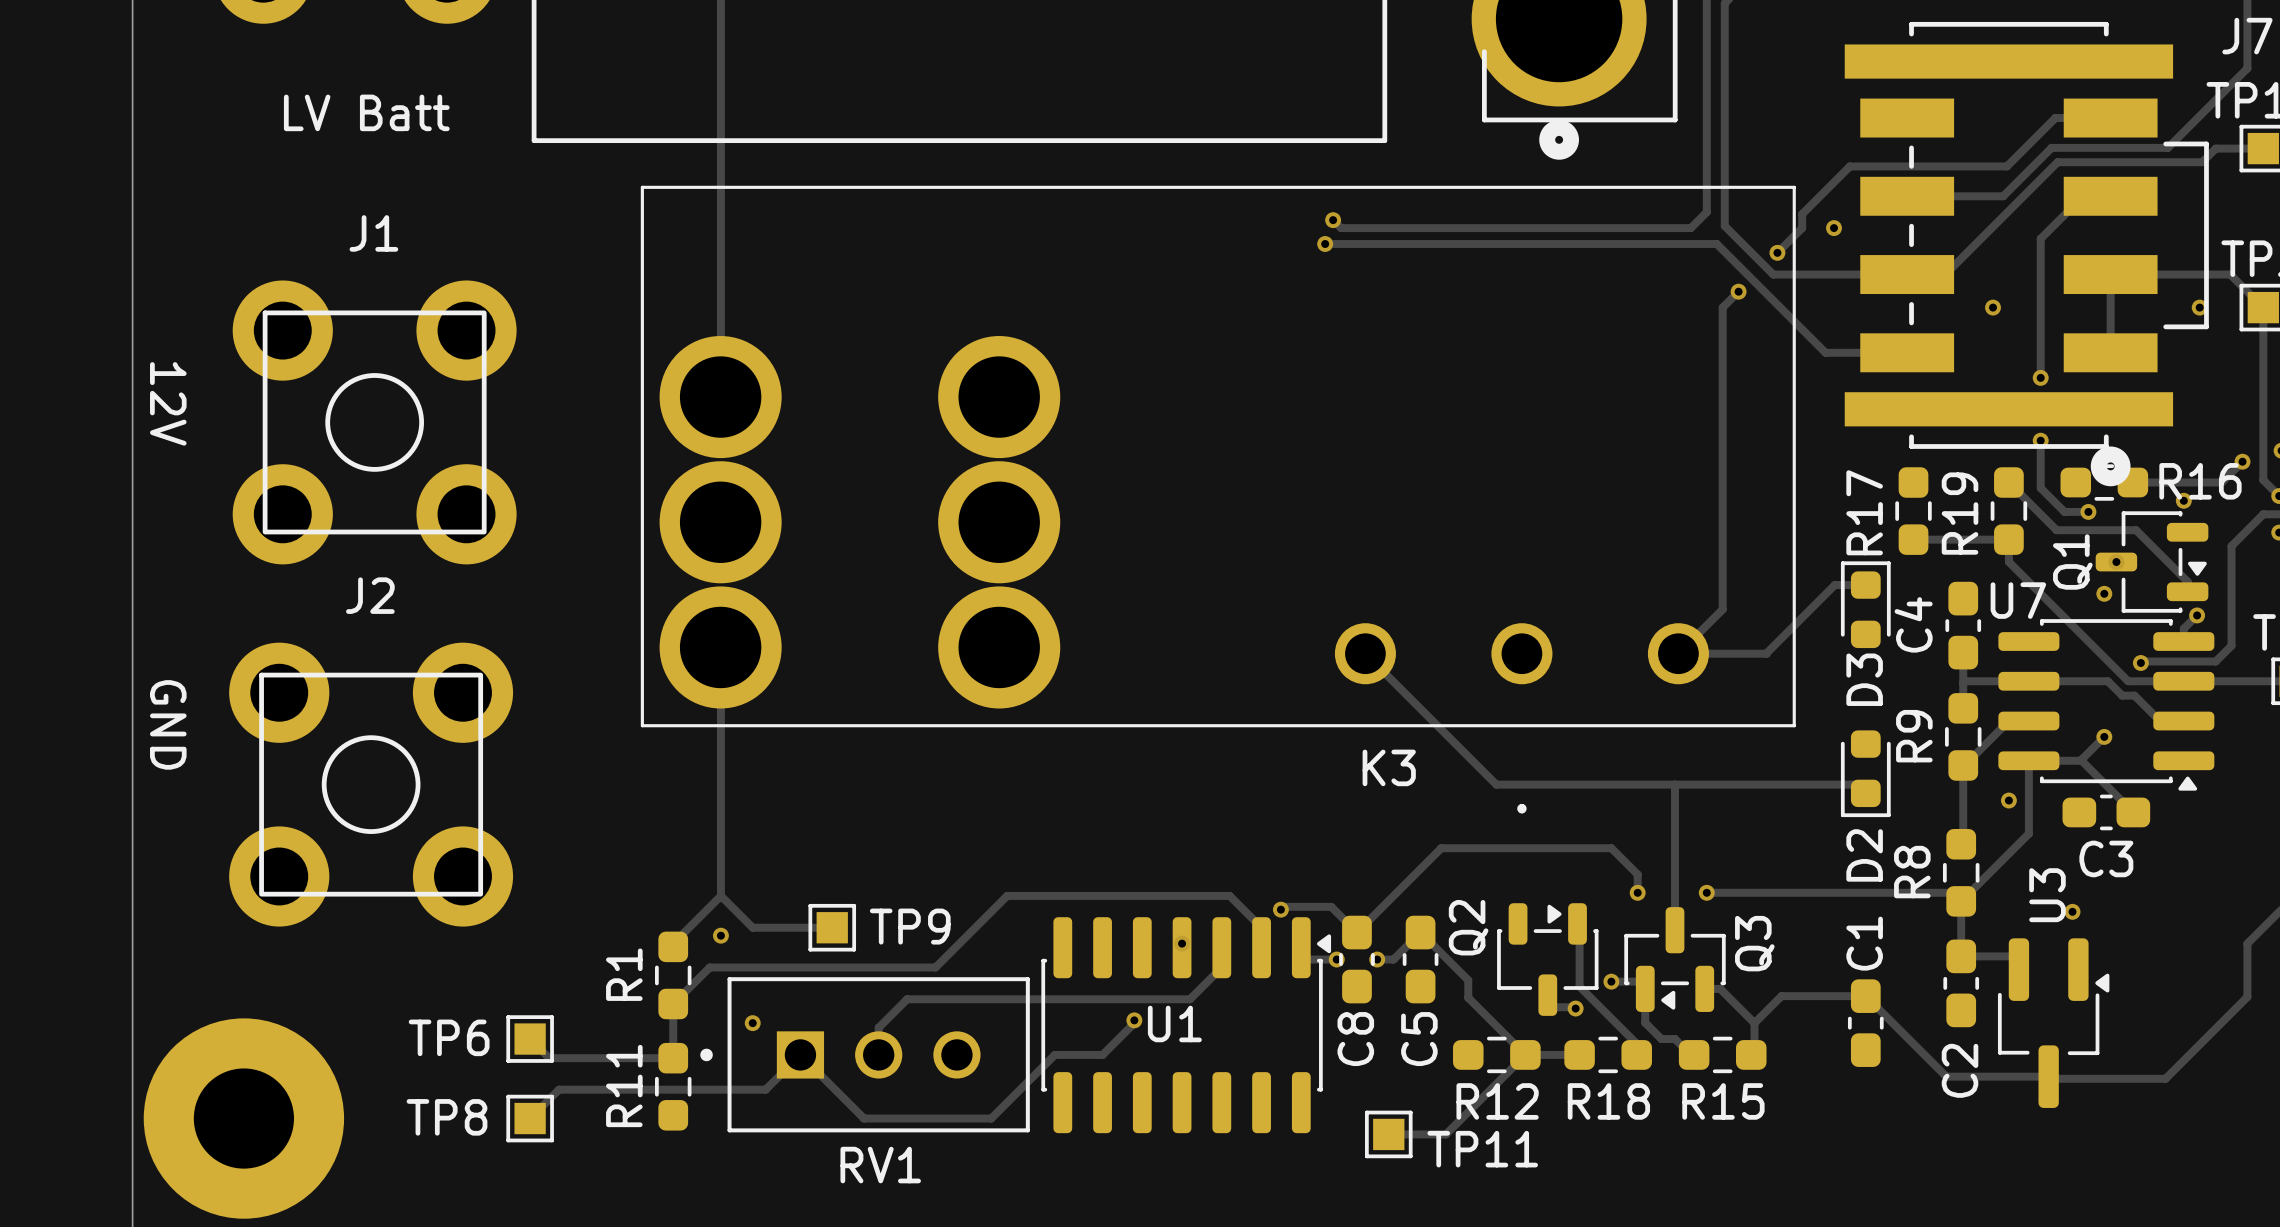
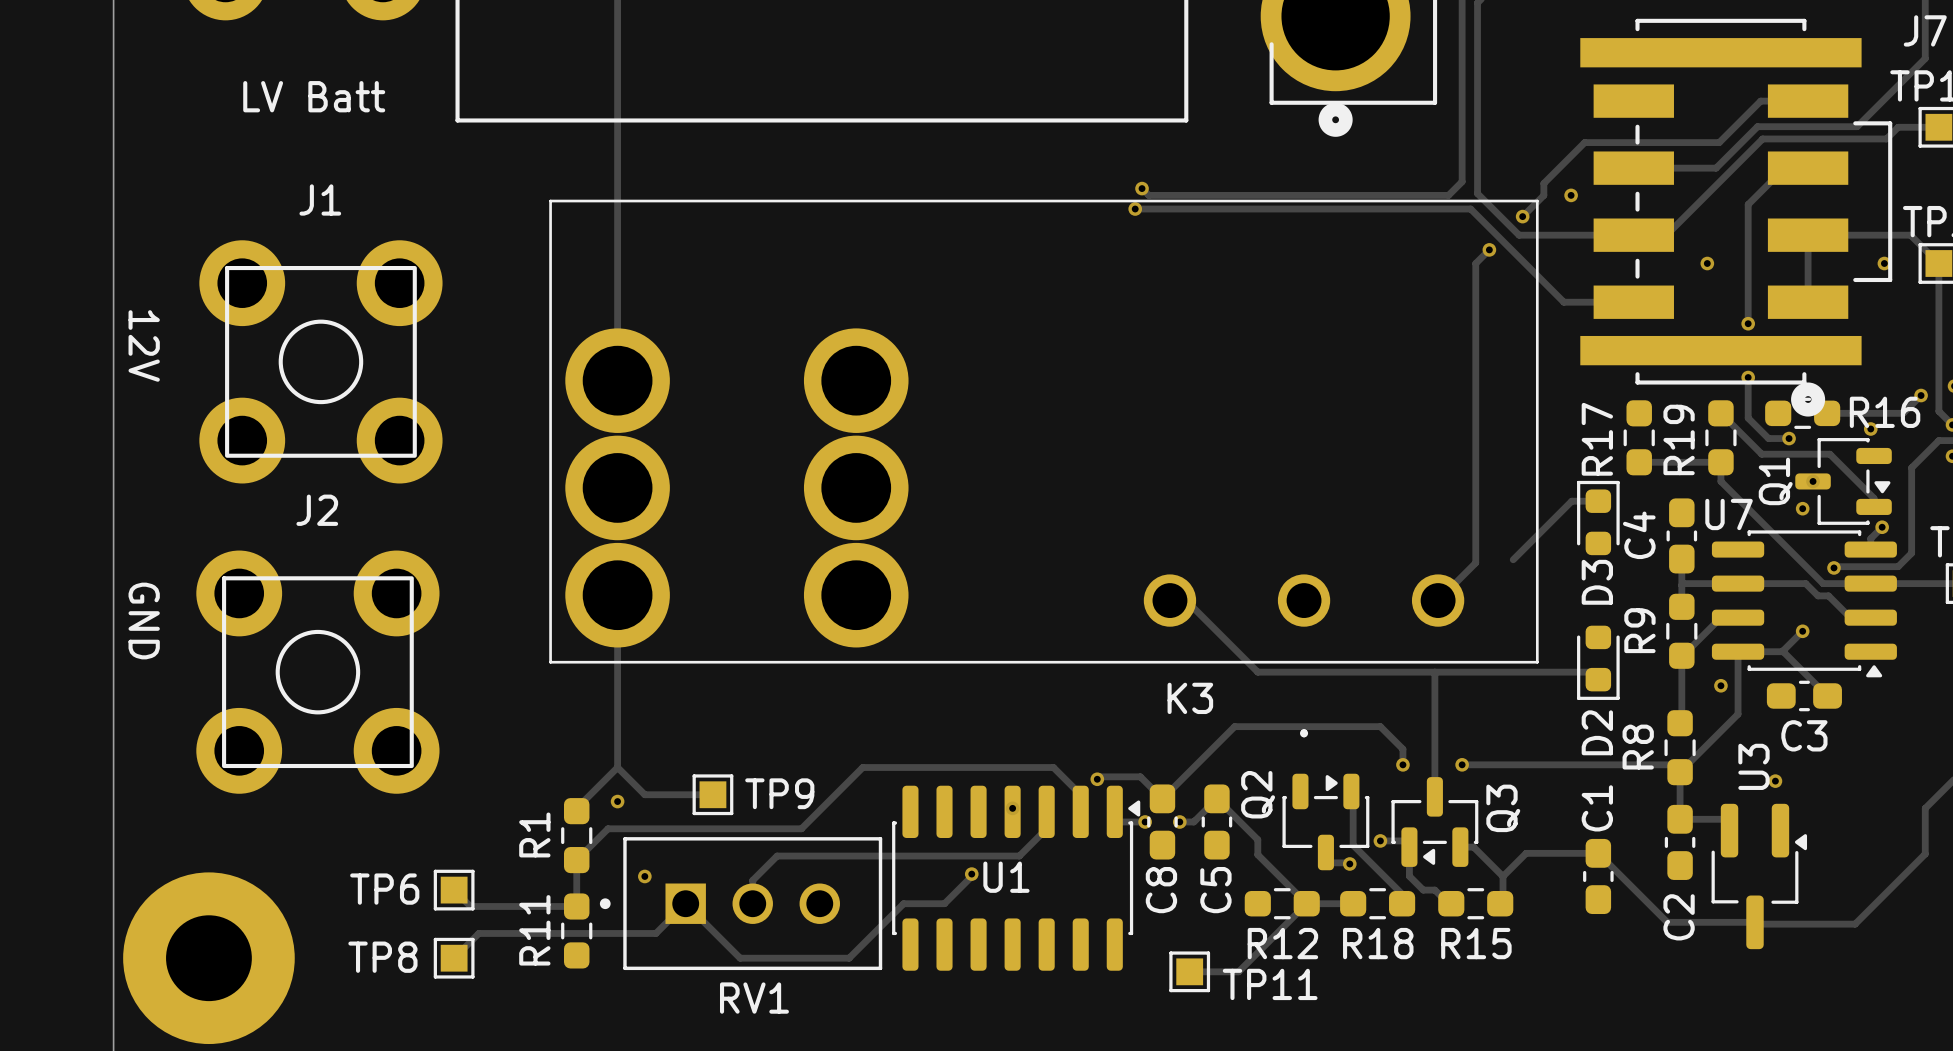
K3 position: (1218, 499) -> (1043, 468)
track: (1722, 609) (1678, 653) (1766, 653) -> (1475, 522) (1475, 562) (1438, 600)
track: (1365, 653) (1496, 784) -> (1169, 600) (1186, 600) (1257, 672) (1281, 672)

